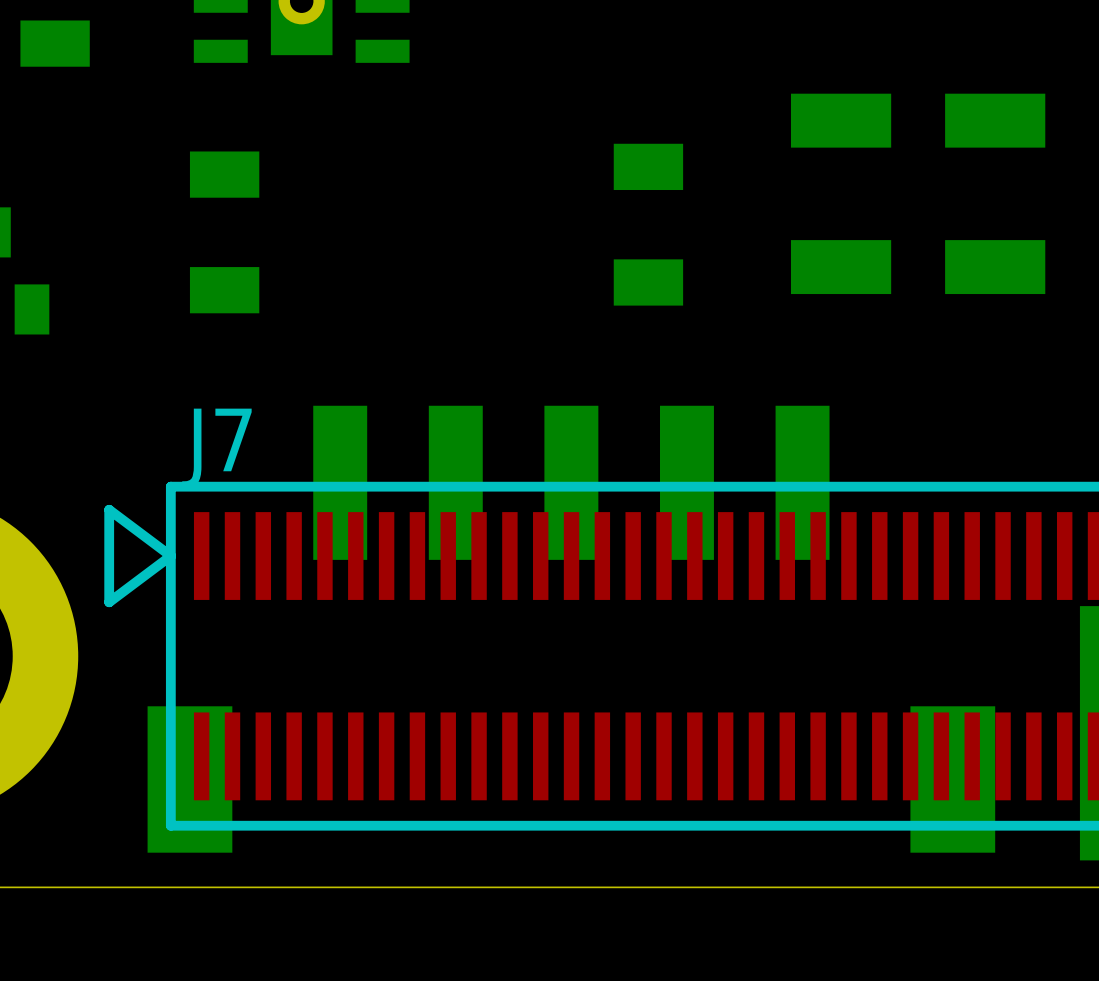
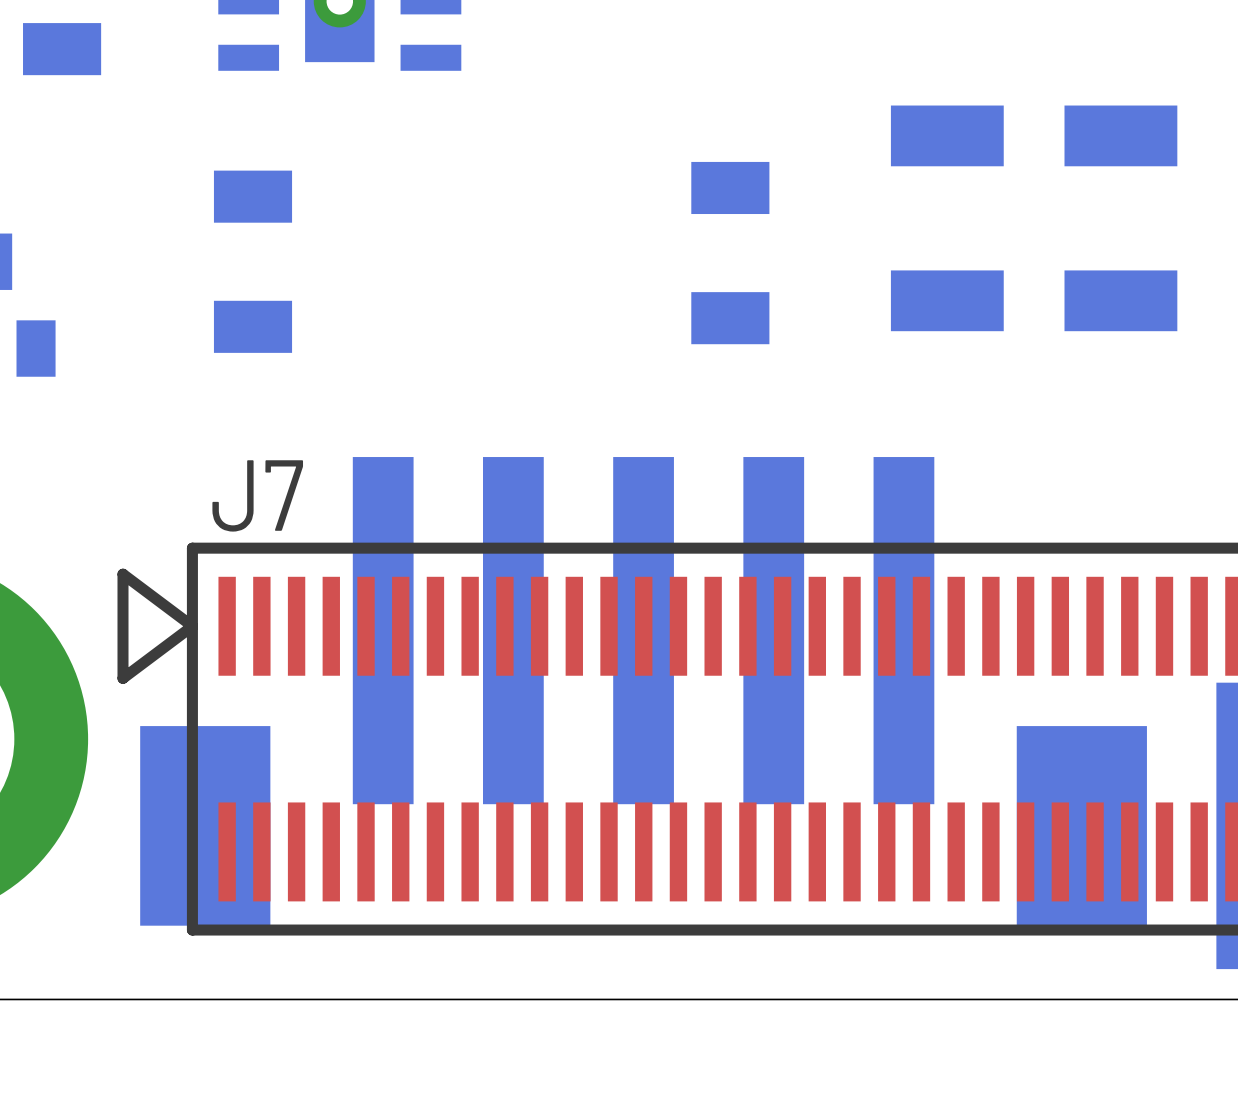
part footprint: [147, 405, 996, 853] -> [140, 457, 1147, 926]

